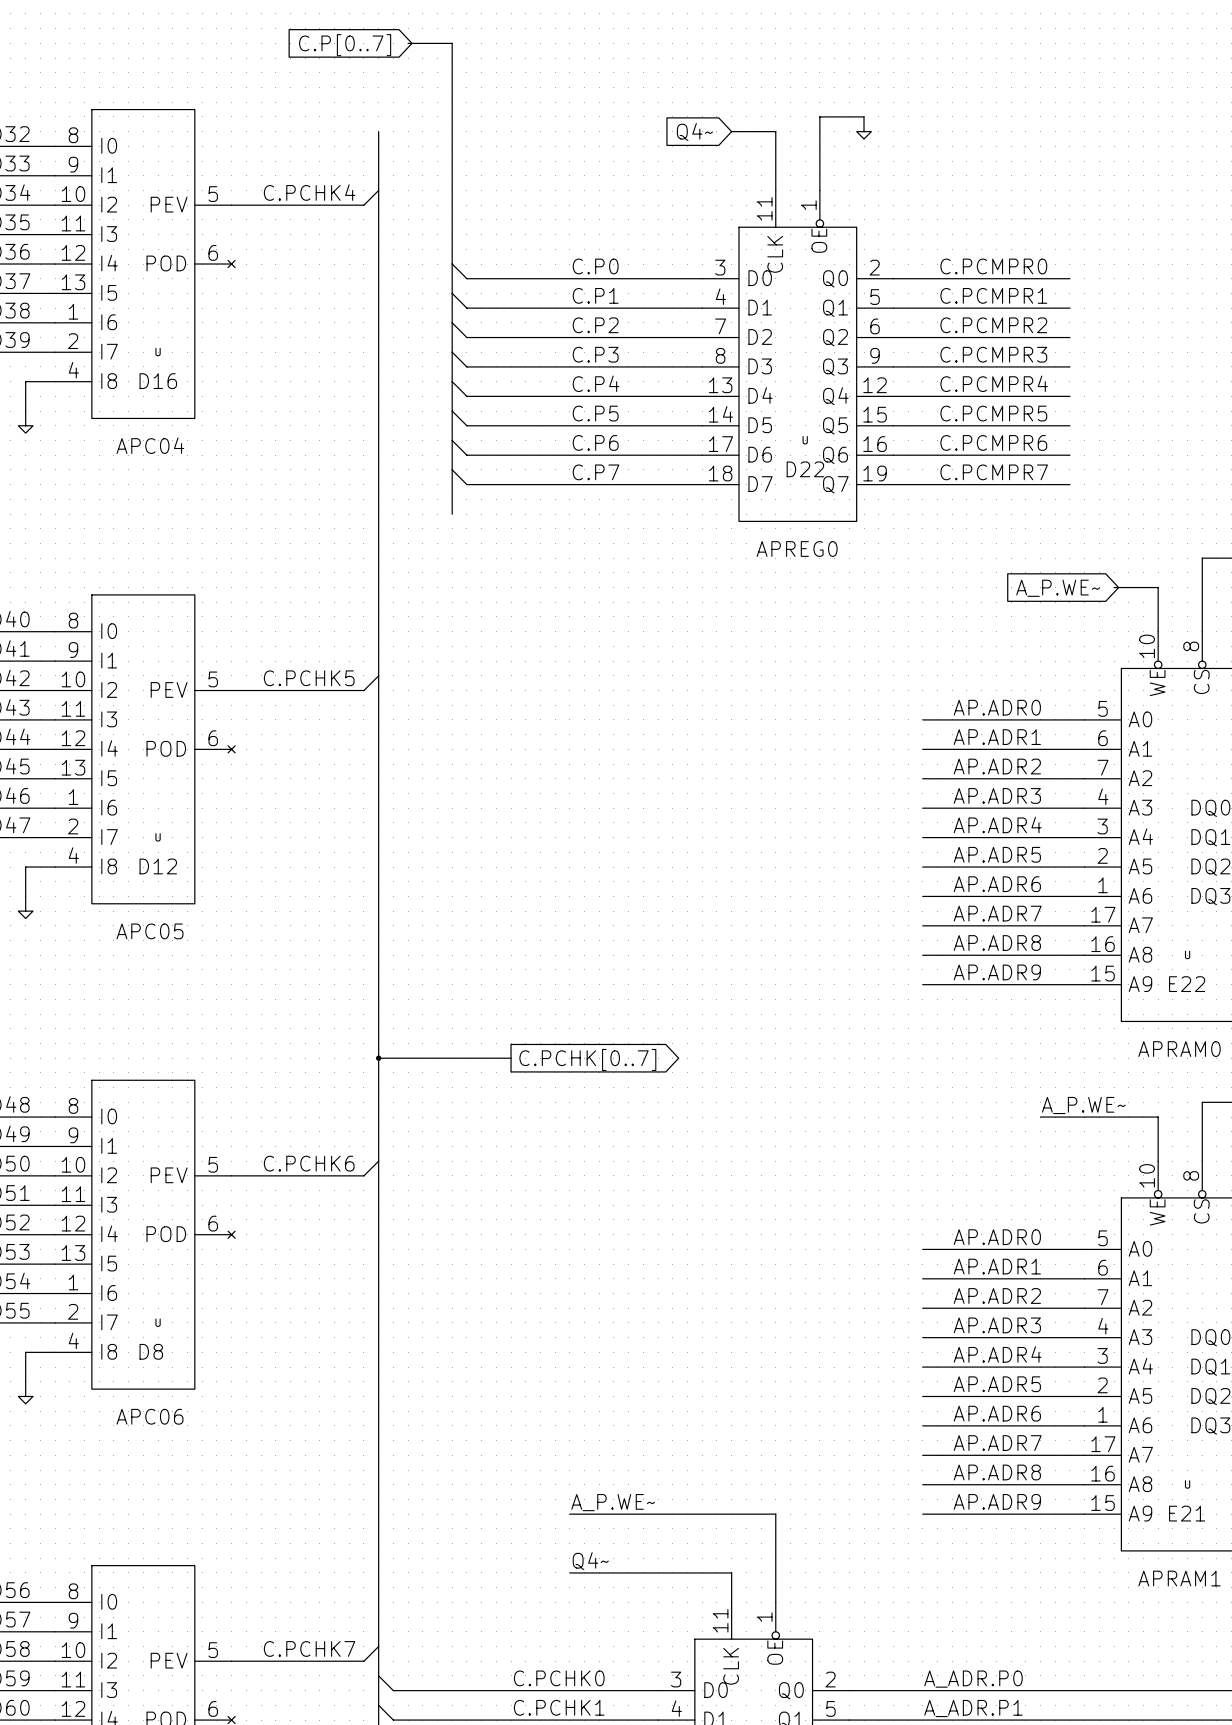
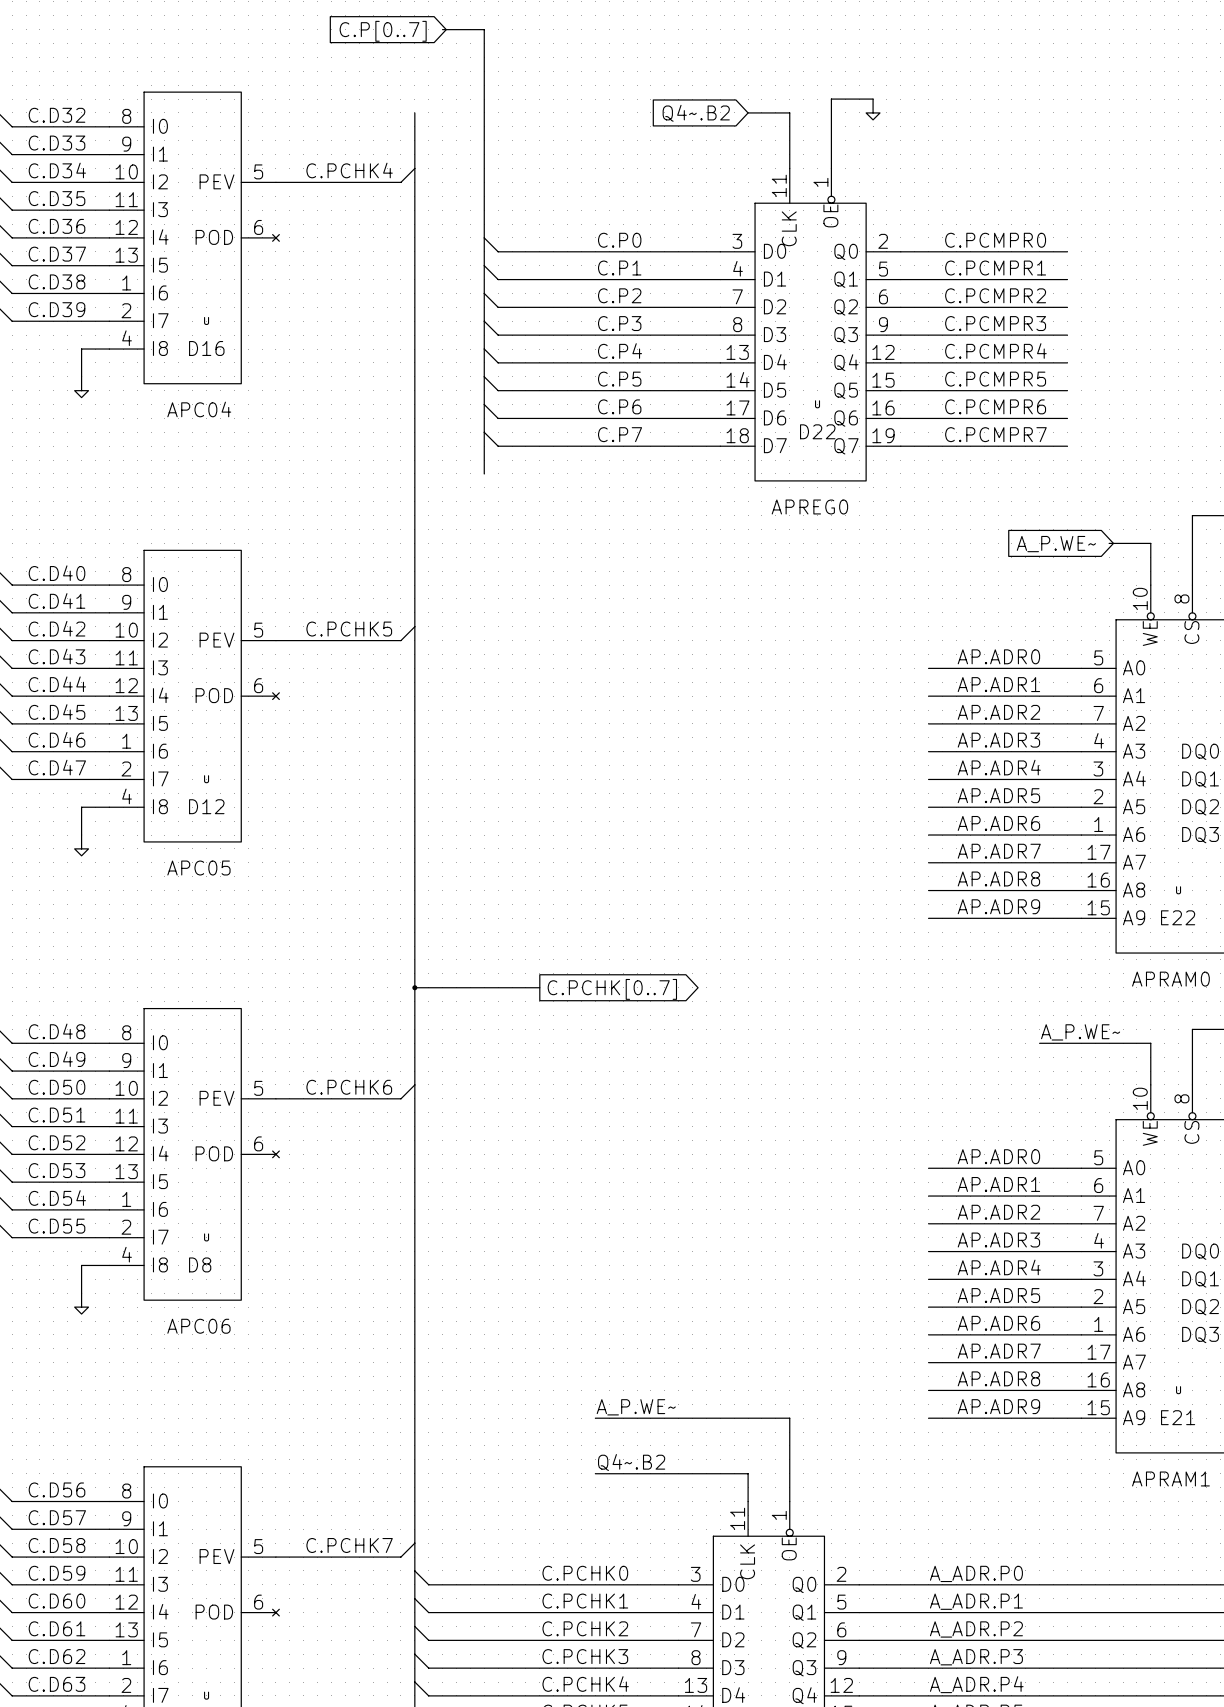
global label: Q4~ (694, 131) -> Q4~.B2 (696, 113)
label: Q4~ (590, 1561) -> Q4~.B2 (631, 1462)

